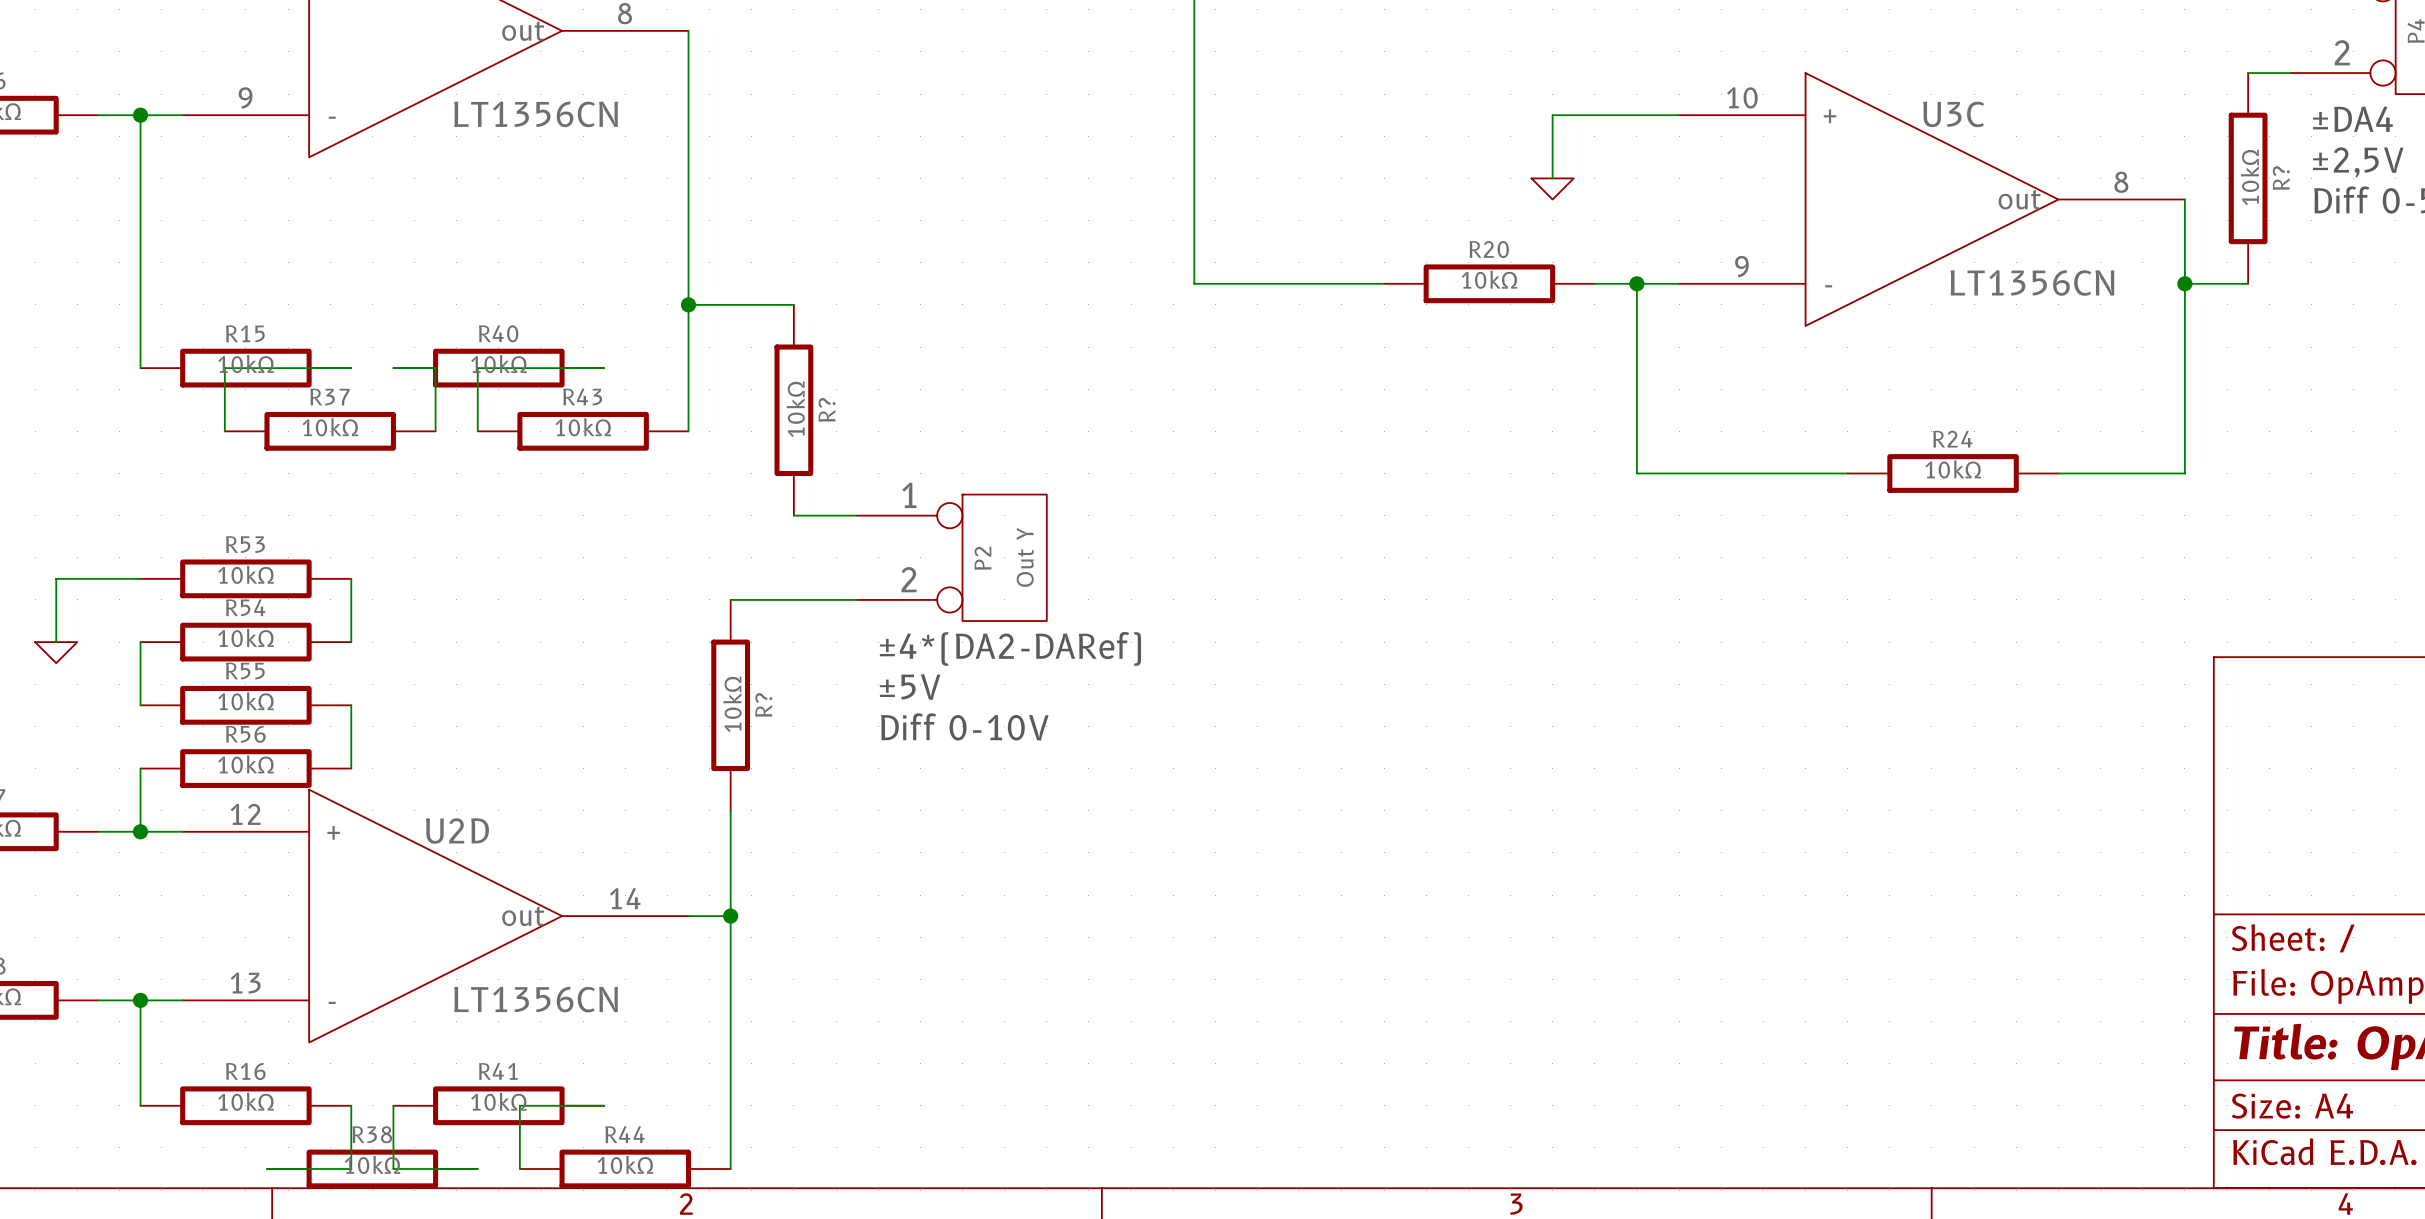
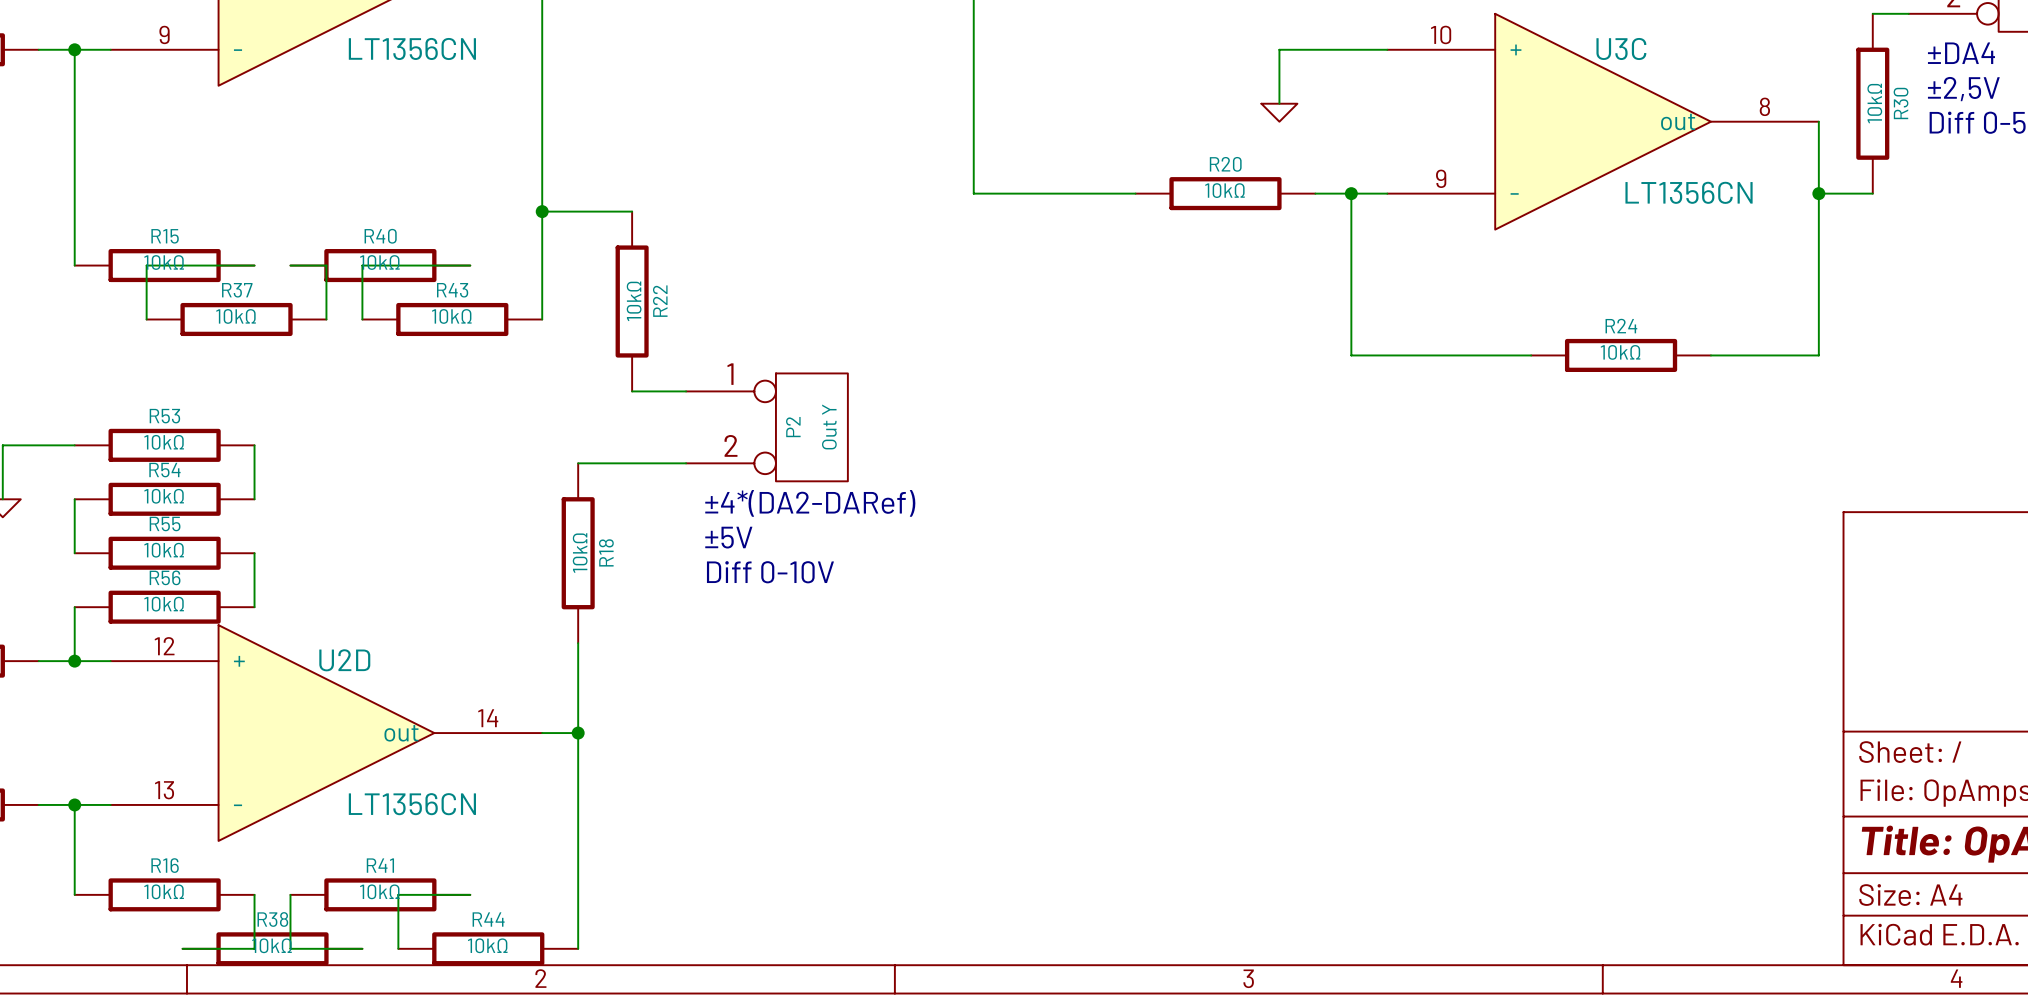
R? name: R? (2281, 178) -> R30 (1901, 103)
R? name: R? (827, 409) -> R22 (660, 301)
R? name: R? (763, 705) -> R18 (606, 552)

